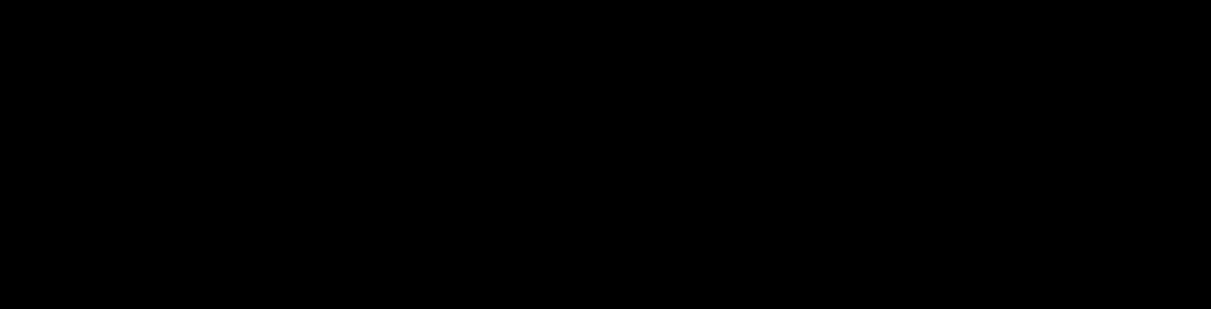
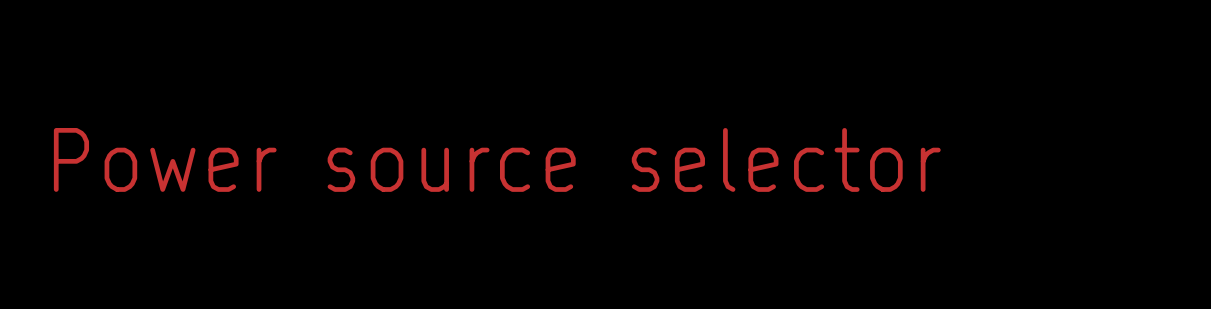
text: none -> Power source selector (497, 159)

